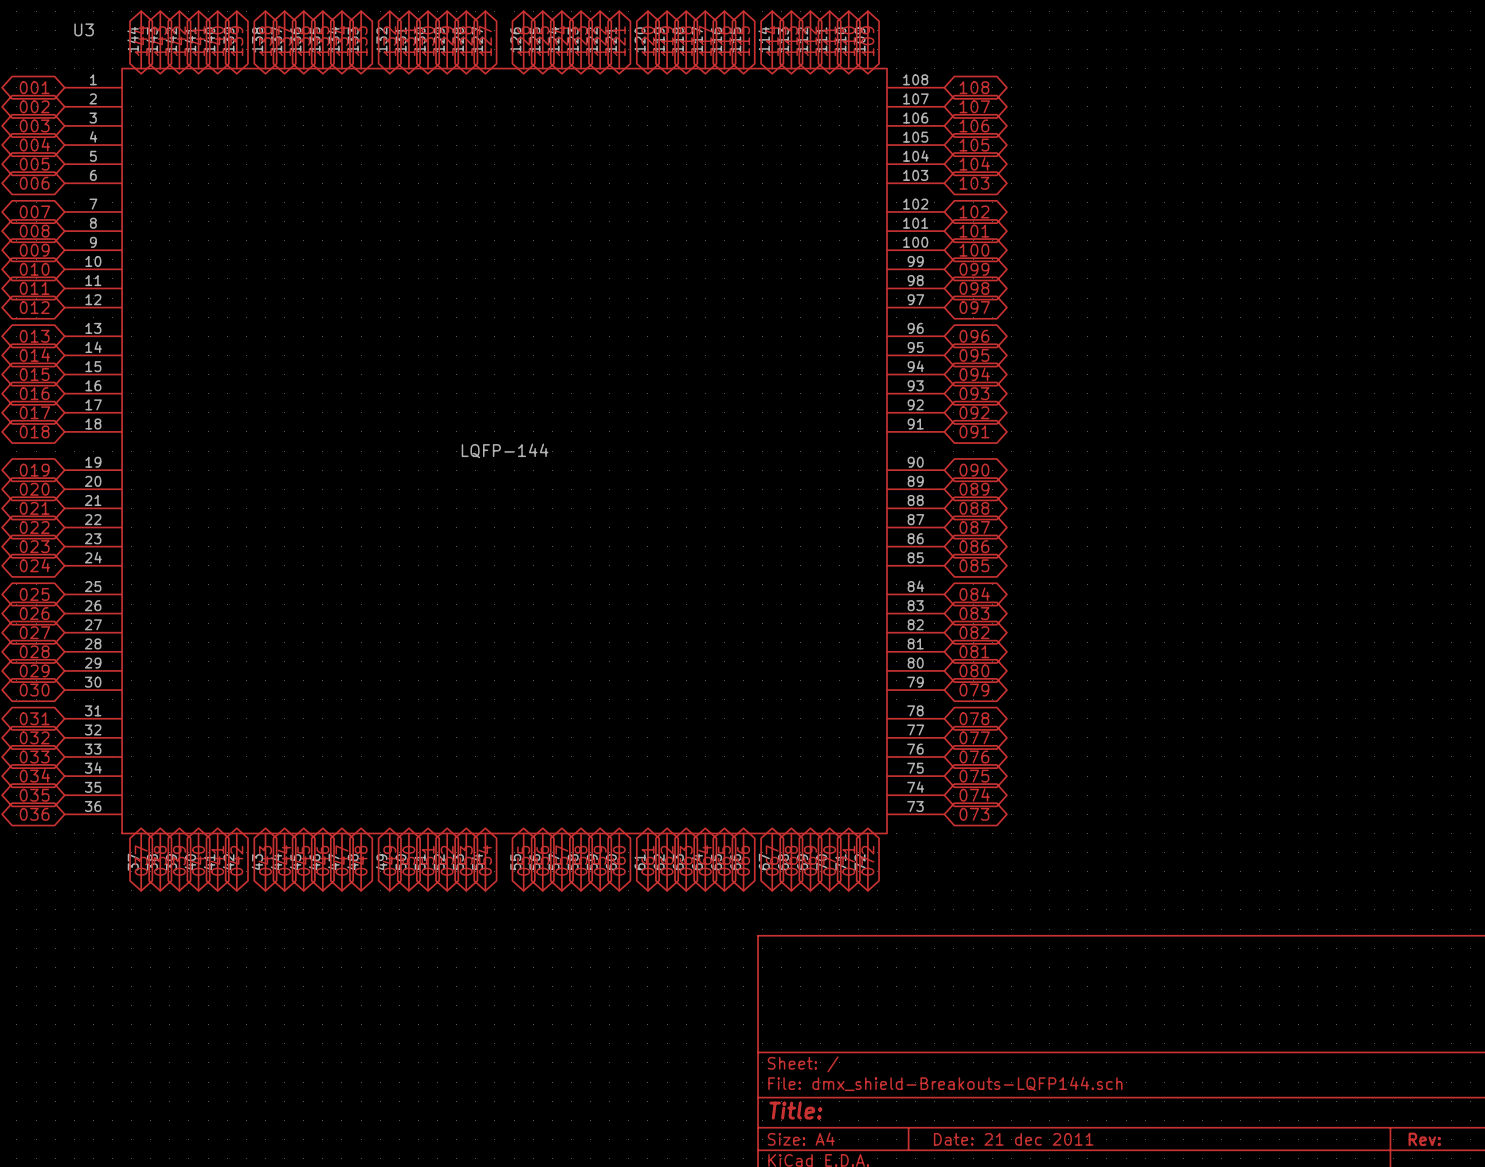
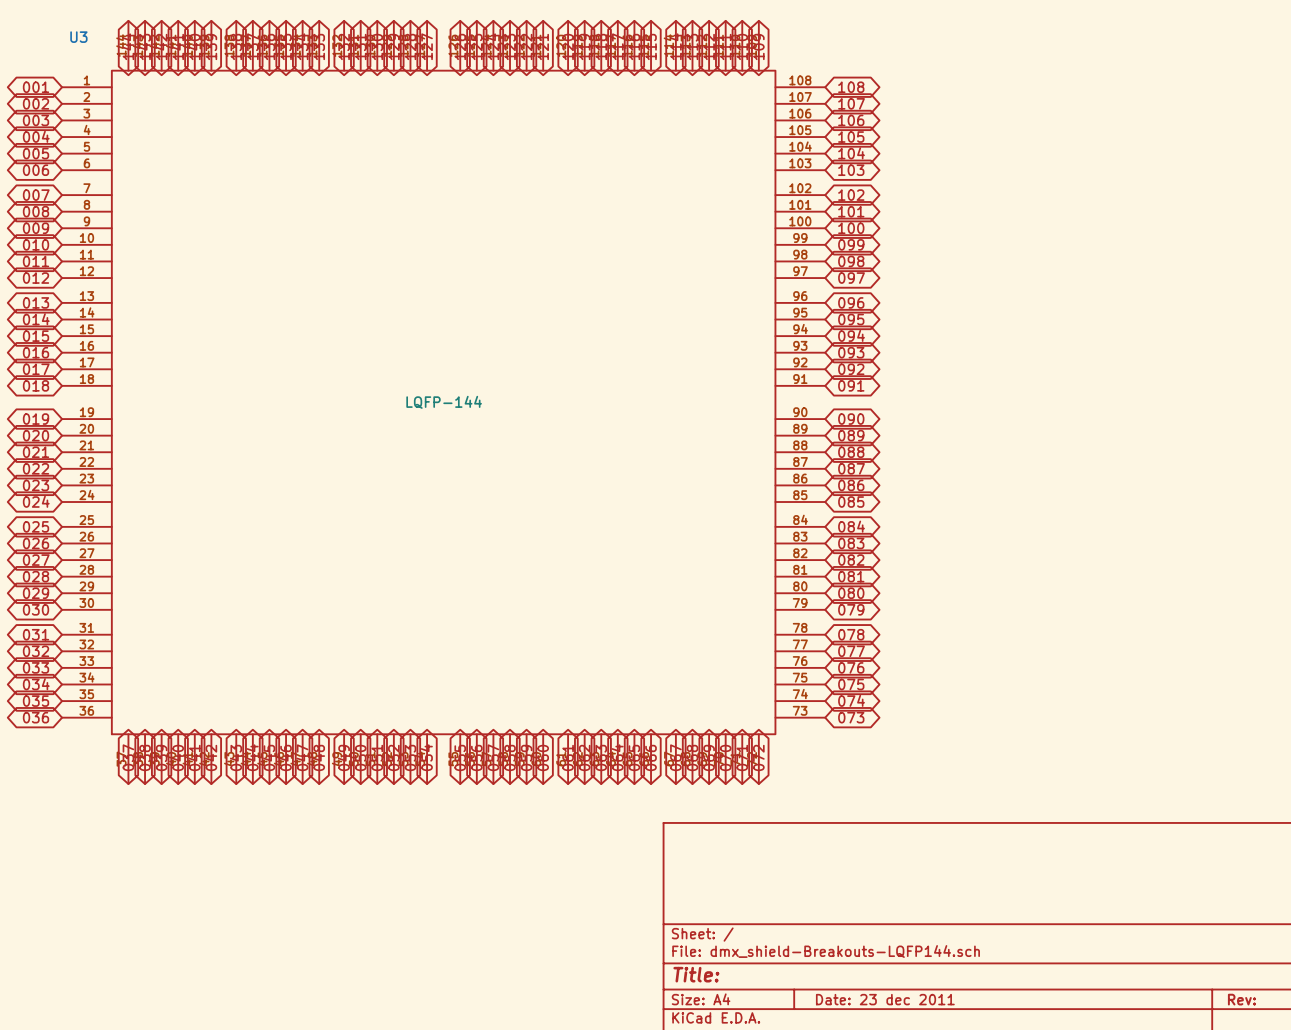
title block: Date: 21 dec 2011 (1013, 1139) -> Date: 23 dec 2011 (885, 999)

